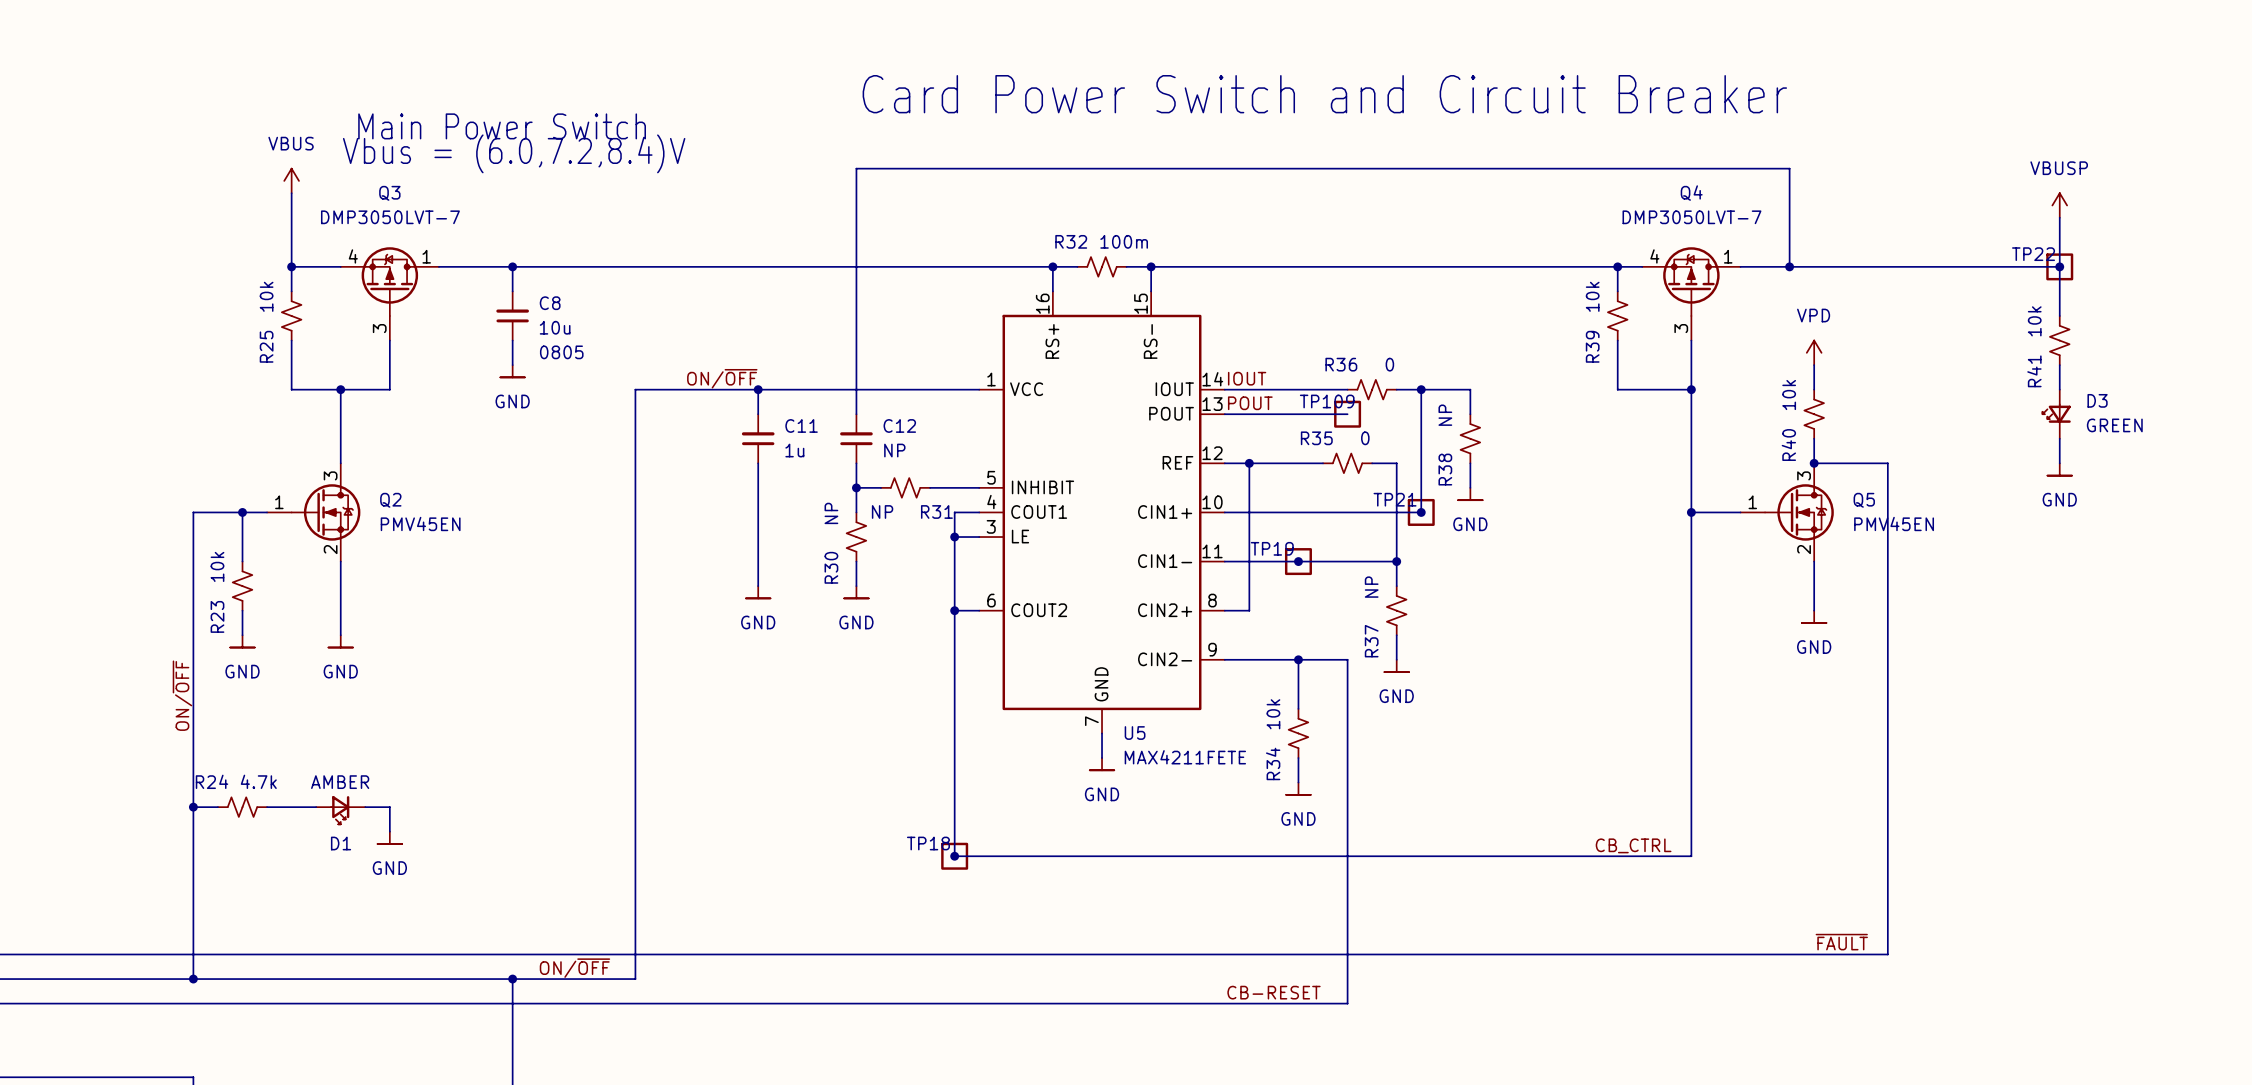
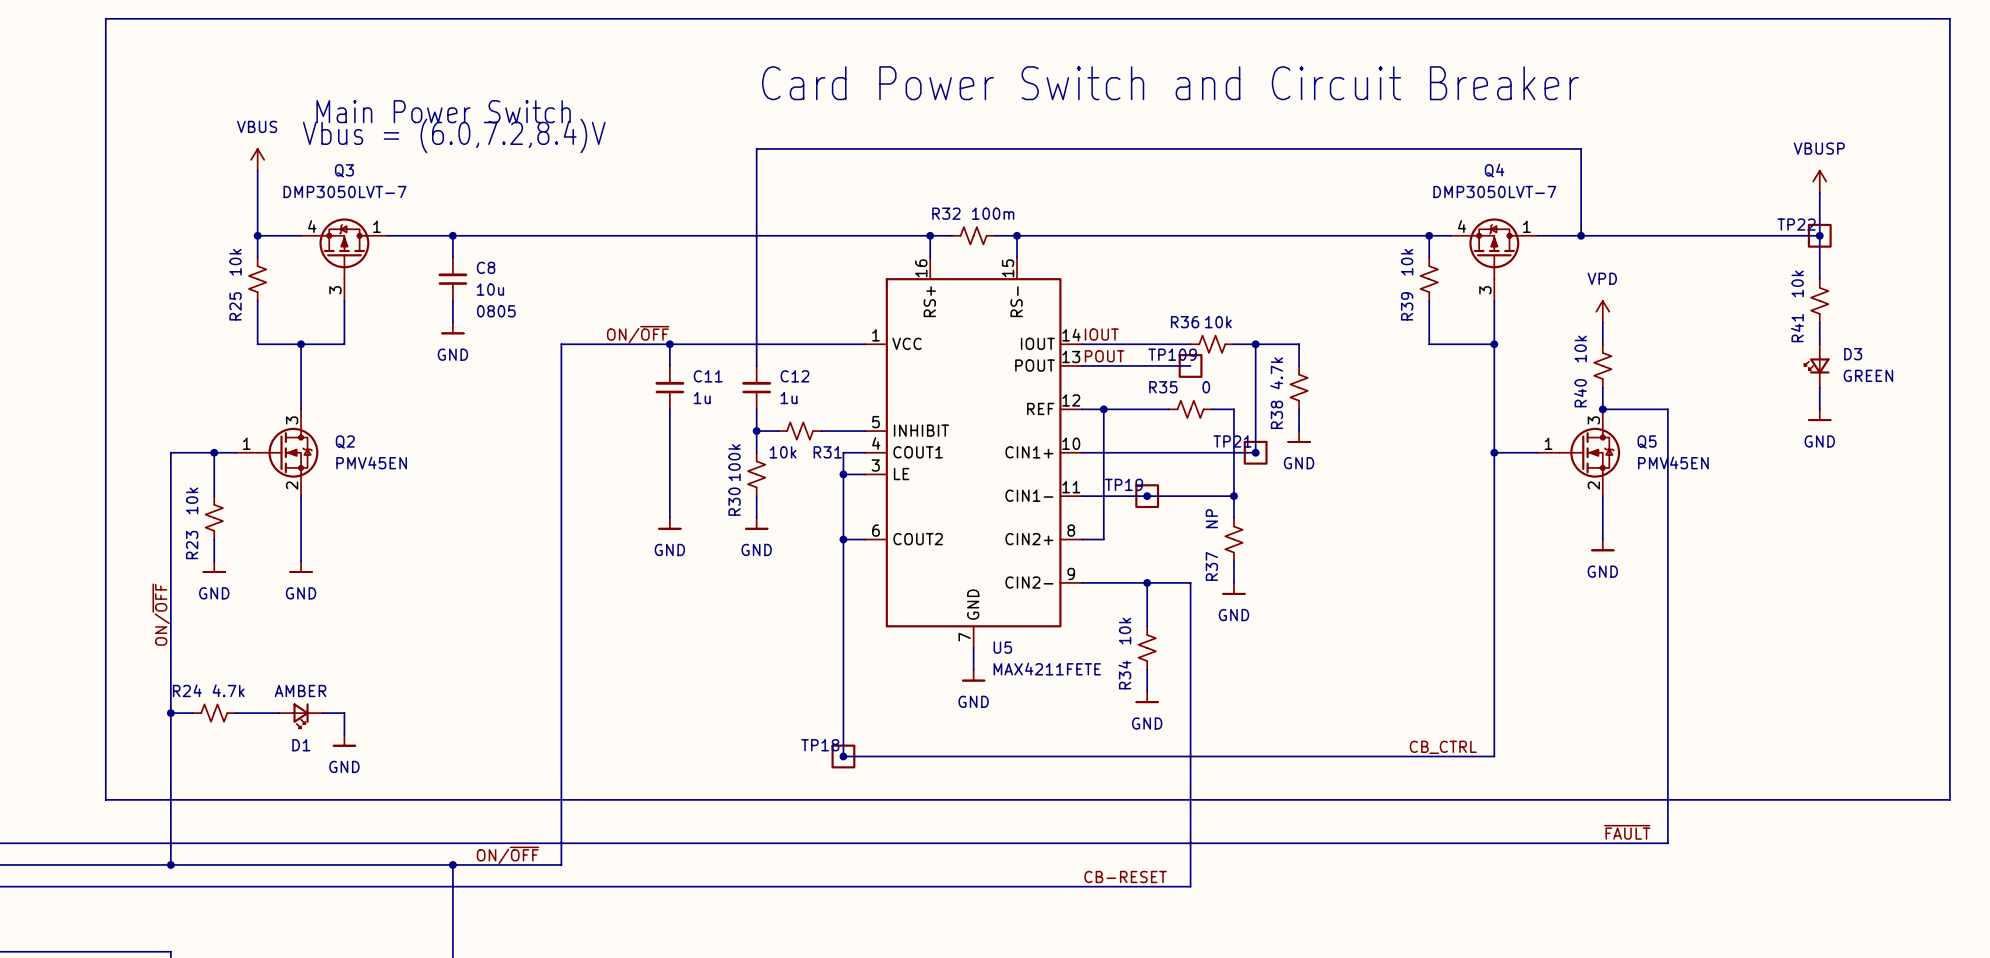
line: none -> (105, 18) (105, 799) (1949, 799) (1949, 18) (105, 18)
R36 value: 0 (1389, 364) -> 10k (1218, 322)
R38 value: NP (1445, 415) -> 4.7k (1276, 373)
C12 value: NP (894, 450) -> 1u (789, 398)
R31 value: NP (882, 511) -> 10k (783, 452)
R30 value: NP (831, 513) -> 100k (734, 462)

